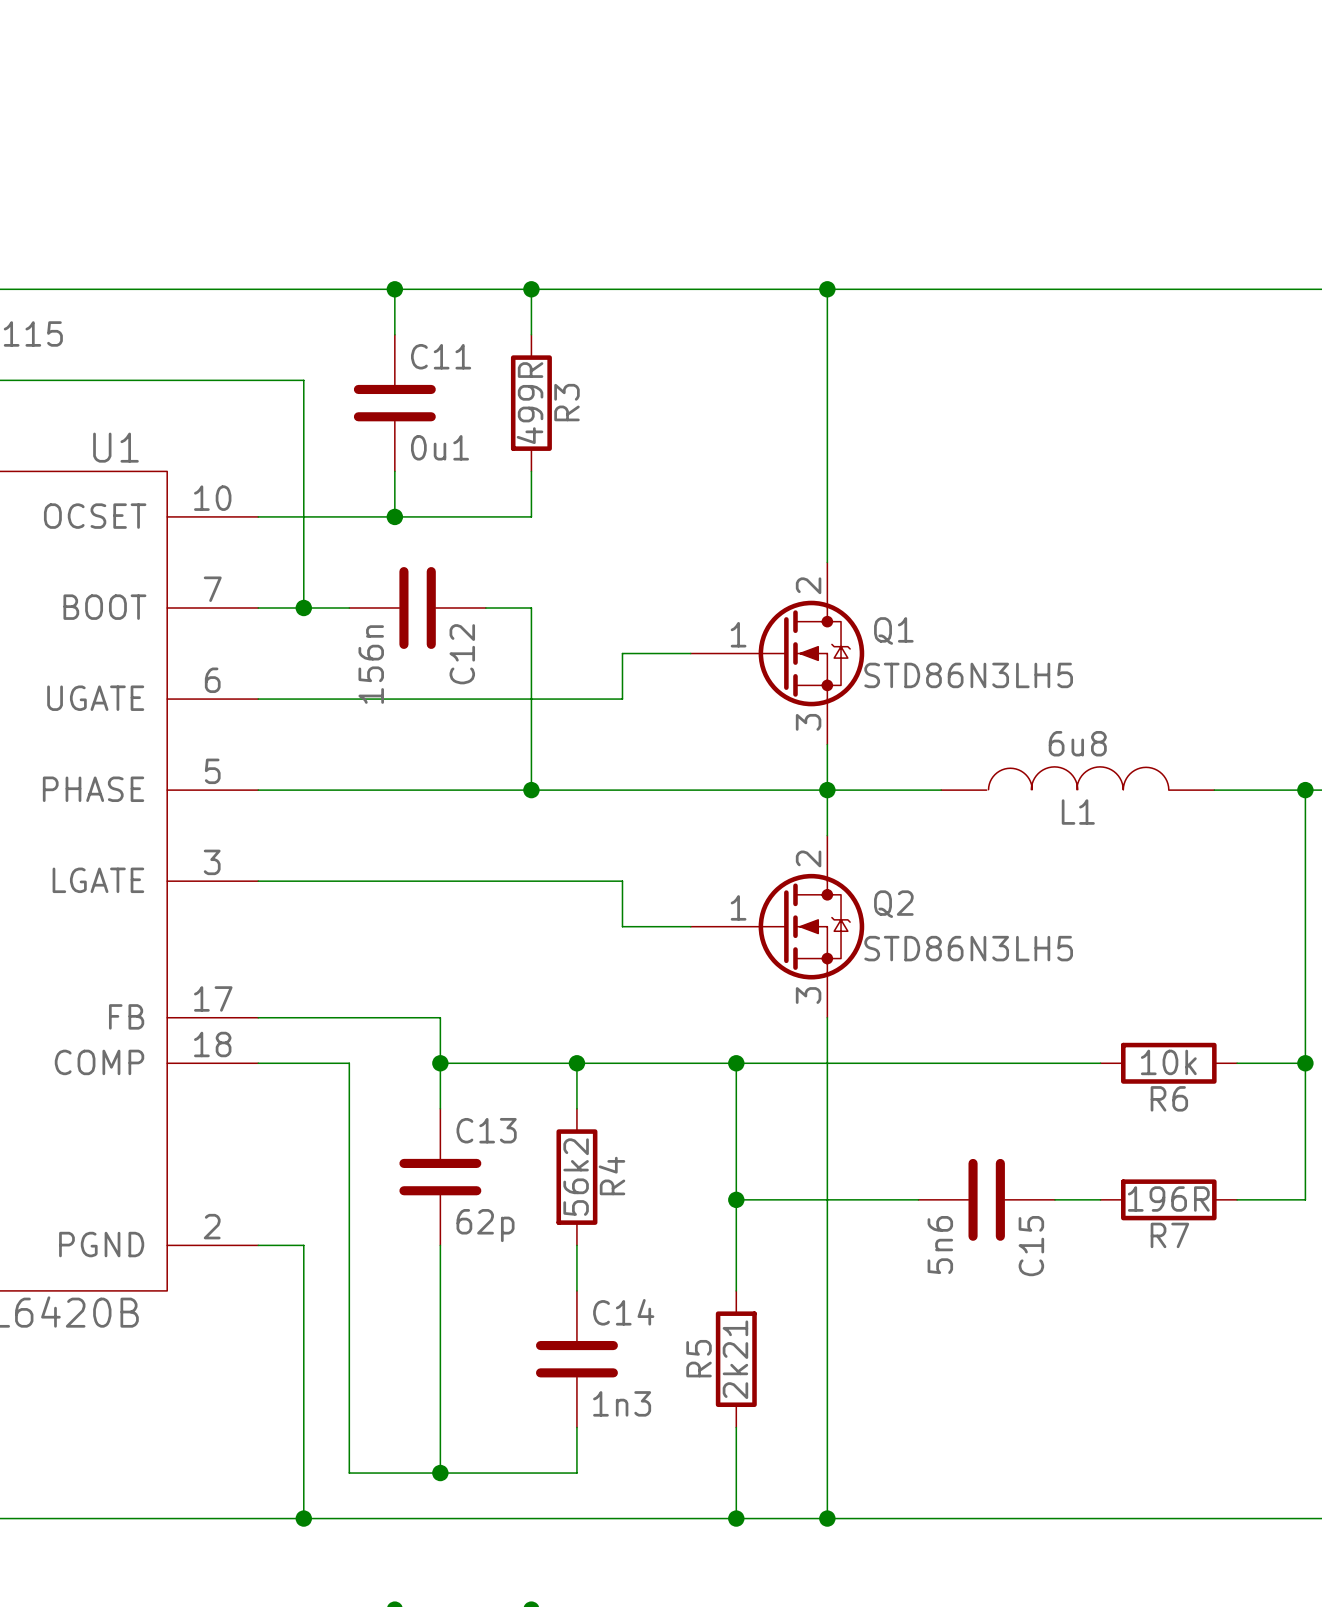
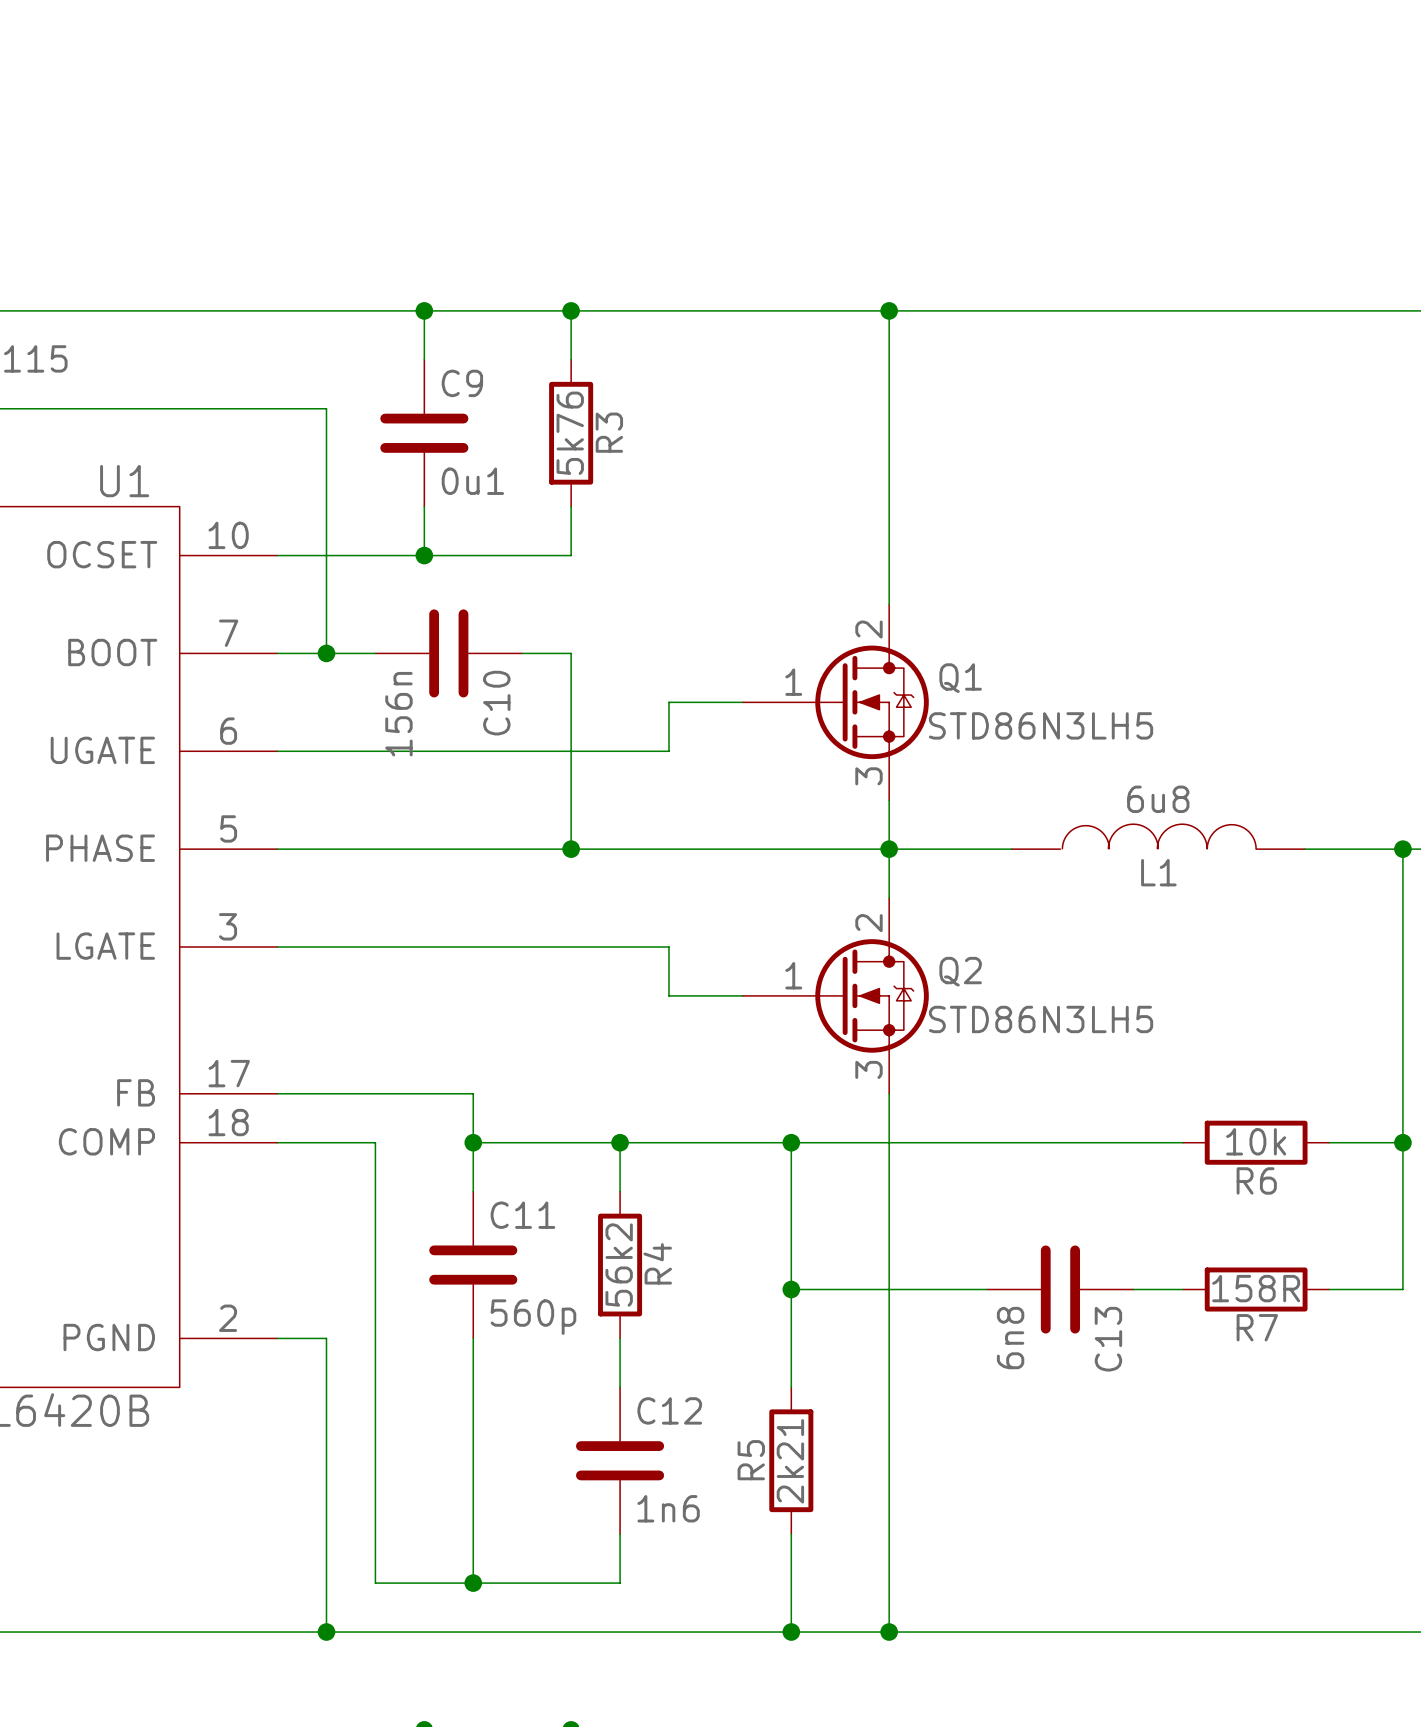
C11 name: C11 (441, 356) -> C9 (462, 383)
R3 value: 499R (530, 403) -> 5k76 (570, 433)
C12 name: C12 (462, 654) -> C10 (496, 703)
C13 name: C13 (486, 1130) -> C11 (522, 1215)
R7 value: 196R (1168, 1199) -> 158R (1256, 1288)
C13 value: 62p (485, 1225) -> 560p (533, 1317)
C15 value: 5n6 (940, 1245) -> 6n8 (1010, 1338)
C15 name: C15 (1031, 1246) -> C13 (1108, 1339)
C14 name: C14 (623, 1312) -> C12 (669, 1410)
C14 value: 1n3 (622, 1403) -> 1n6 (668, 1508)

